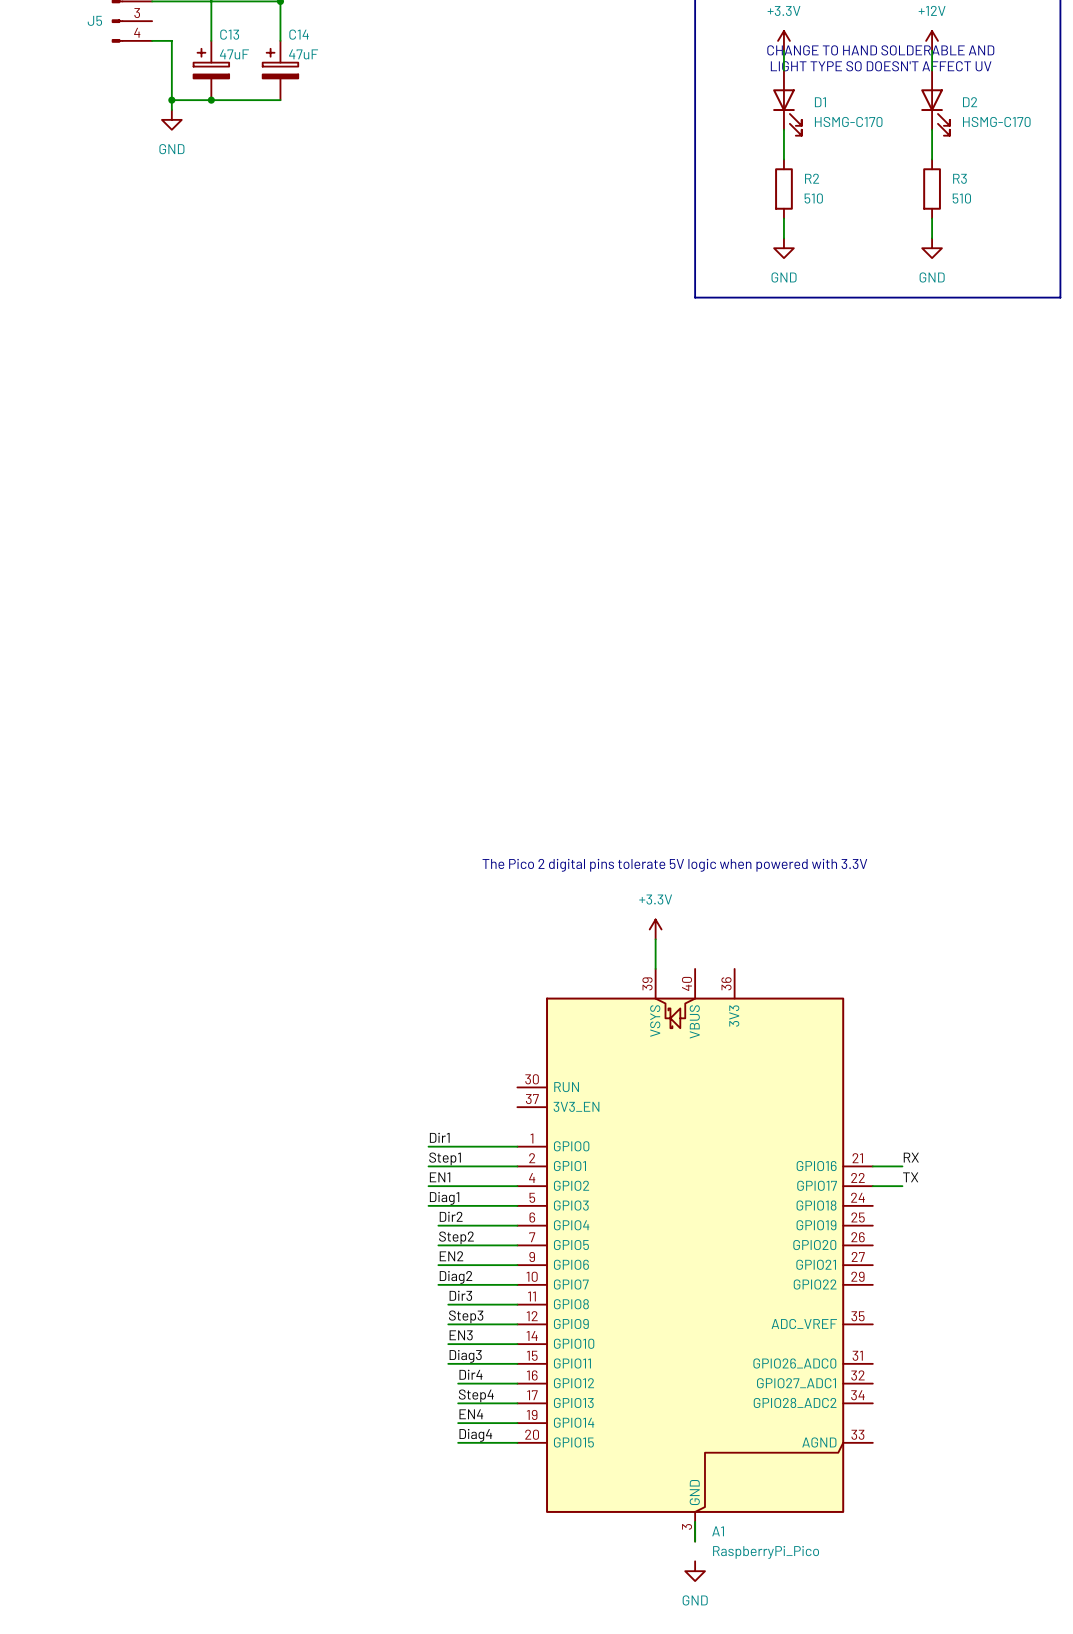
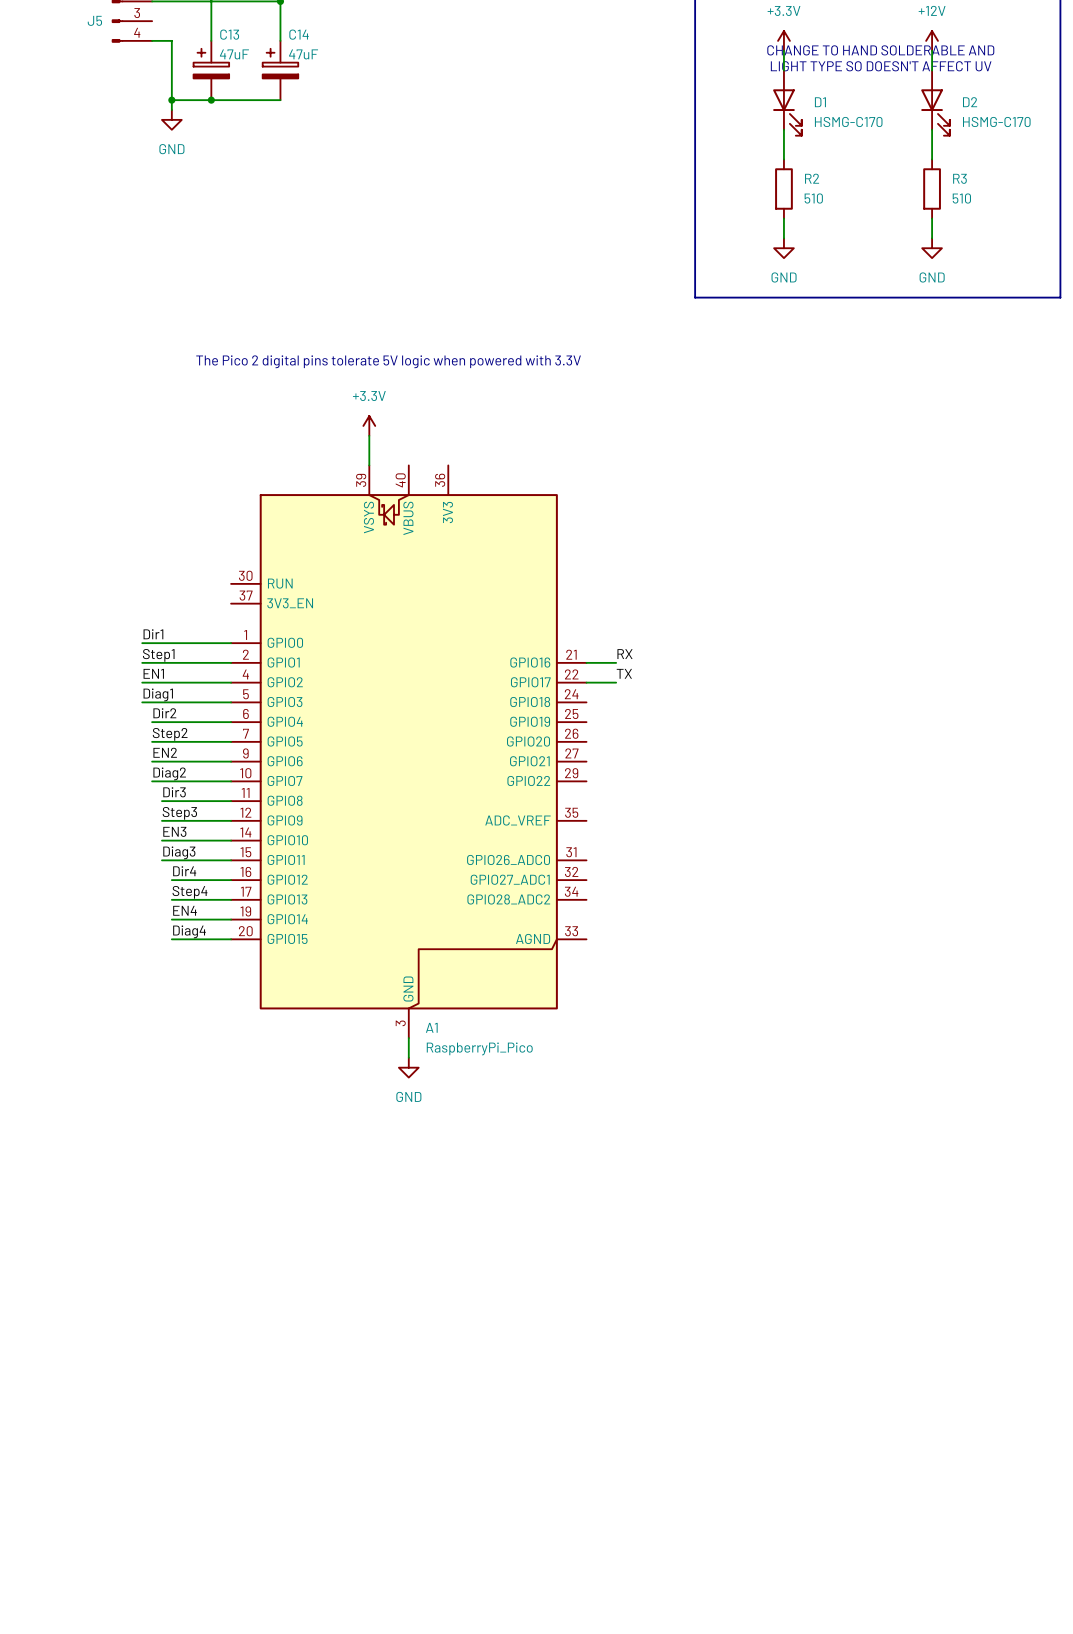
text: none -> The Pico 2 digital pins tolerate 5V logic when powered with 3.3V (388, 361)
power symbol: none -> +3.3V (369, 425)
wire: none -> (369, 435) (369, 465)
label: none -> Dir1 (153, 634)
wire: none -> (142, 643) (231, 643)
label: none -> RX (624, 654)
label: none -> Step1 (158, 655)
wire: none -> (142, 662) (231, 662)
wire: none -> (586, 662) (616, 662)
label: none -> EN1 (153, 673)
label: none -> TX (624, 673)
wire: none -> (142, 682) (231, 682)
wire: none -> (586, 682) (616, 682)
label: none -> Diag1 (158, 694)
wire: none -> (142, 702) (231, 702)
label: none -> Dir2 (164, 713)
wire: none -> (152, 722) (231, 722)
label: none -> Step2 (170, 734)
wire: none -> (152, 741) (231, 741)
label: none -> EN2 (165, 752)
wire: none -> (152, 761) (231, 761)
label: none -> Diag2 (169, 773)
wire: none -> (152, 781) (231, 781)
label: none -> Dir3 (174, 792)
wire: none -> (161, 801) (231, 801)
label: none -> Step3 (179, 813)
wire: none -> (161, 820) (231, 820)
label: none -> EN3 (174, 831)
wire: none -> (161, 840) (231, 840)
label: none -> Diag3 (179, 852)
wire: none -> (161, 860) (231, 860)
text: The Pico 2 digital pins tolerate 5V logic when powered with 3.3V (674, 865) -> none
label: none -> Dir4 (184, 871)
wire: none -> (171, 880) (231, 880)
label: none -> Step4 (190, 892)
wire: none -> (171, 899) (231, 899)
label: none -> EN4 (185, 910)
wire: none -> (171, 919) (231, 919)
power symbol: +3.3V (655, 929) -> none
label: none -> Diag4 (189, 931)
wire: none -> (171, 939) (231, 939)
wire: (655, 939) (655, 968) -> none
wire: none -> (408, 1038) (408, 1057)
power symbol: none -> GND (408, 1067)
label: Dir1 (439, 1137) -> none
wire: (428, 1146) (517, 1146) -> none
label: RX (911, 1157) -> none
label: Step1 (445, 1158) -> none
wire: (428, 1166) (517, 1166) -> none
wire: (872, 1166) (902, 1166) -> none
label: EN1 (440, 1177) -> none
label: TX (910, 1177) -> none
wire: (428, 1186) (517, 1186) -> none
wire: (872, 1186) (902, 1186) -> none
label: Diag1 (444, 1198) -> none
wire: (428, 1205) (517, 1205) -> none
label: Dir2 (451, 1216) -> none
wire: (438, 1225) (517, 1225) -> none
label: Step2 (456, 1237) -> none
wire: (438, 1245) (517, 1245) -> none
A1 position: (695, 1255) -> (408, 751)
label: EN2 (451, 1256) -> none
wire: (438, 1265) (517, 1265) -> none
label: Diag2 (455, 1277) -> none
wire: (438, 1284) (517, 1284) -> none
label: Dir3 (460, 1295) -> none
wire: (448, 1304) (517, 1304) -> none
label: Step3 (466, 1316) -> none
wire: (448, 1324) (517, 1324) -> none
label: EN3 (461, 1335) -> none
wire: (448, 1344) (517, 1344) -> none
label: Diag3 (465, 1356) -> none
wire: (448, 1363) (517, 1363) -> none
label: Dir4 (471, 1374) -> none
wire: (458, 1383) (517, 1383) -> none
label: Step4 (476, 1395) -> none
wire: (458, 1403) (517, 1403) -> none
label: EN4 (471, 1414) -> none
wire: (458, 1423) (517, 1423) -> none
label: Diag4 (475, 1435) -> none
wire: (458, 1442) (517, 1442) -> none
wire: (695, 1521) (695, 1541) -> none
power symbol: GND (695, 1571) -> none

